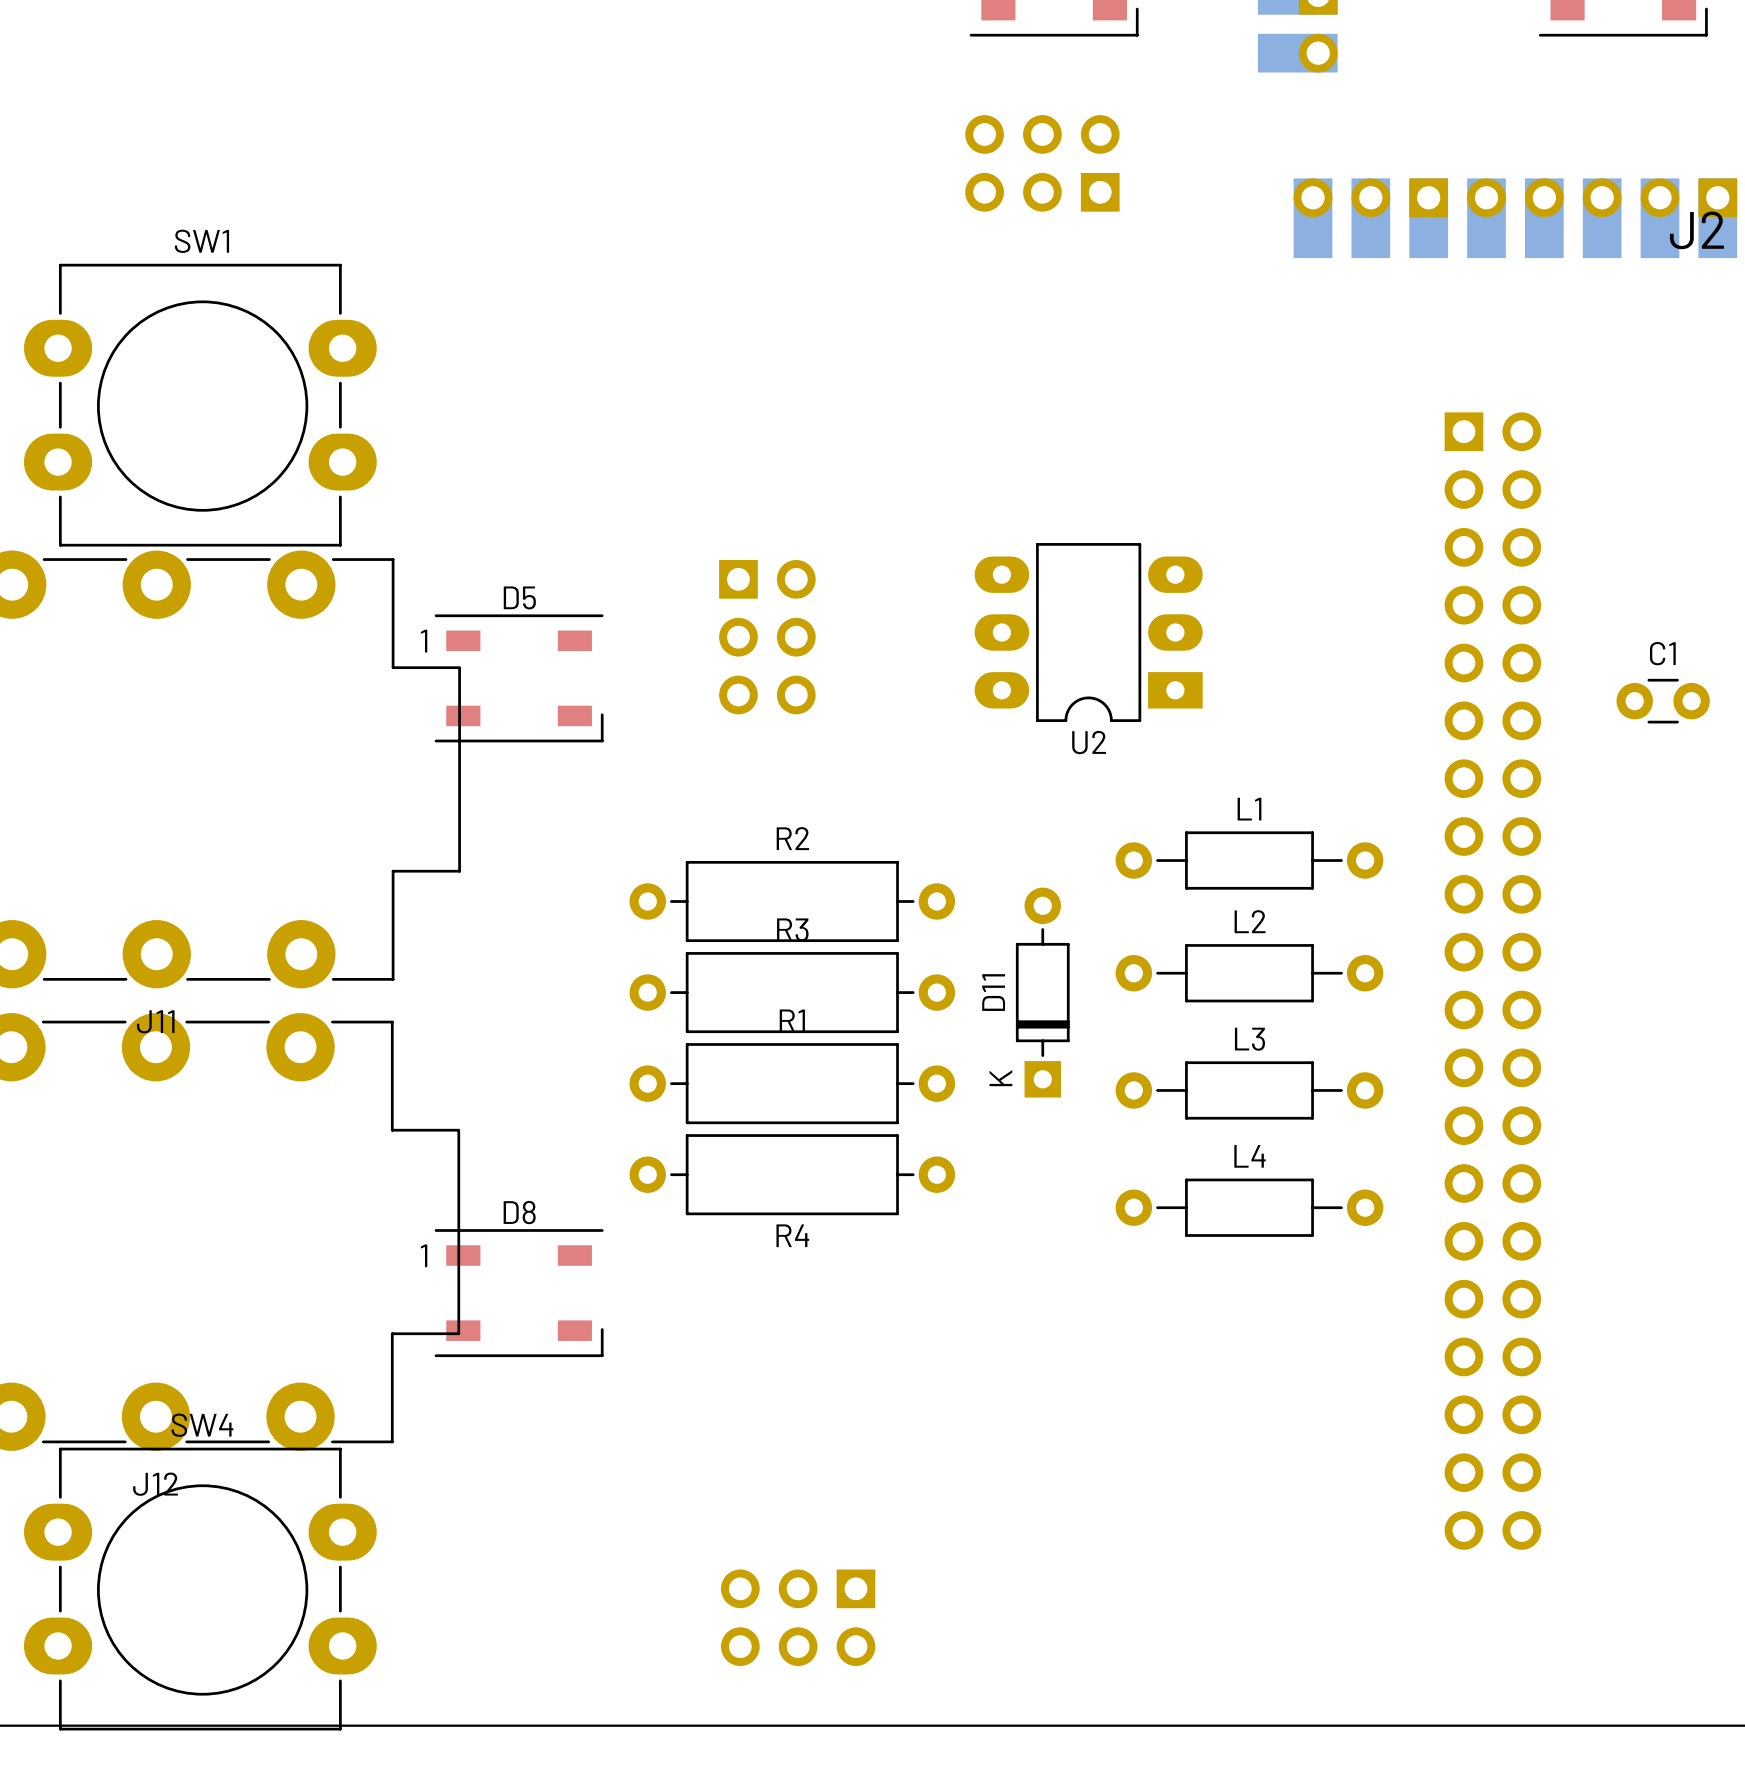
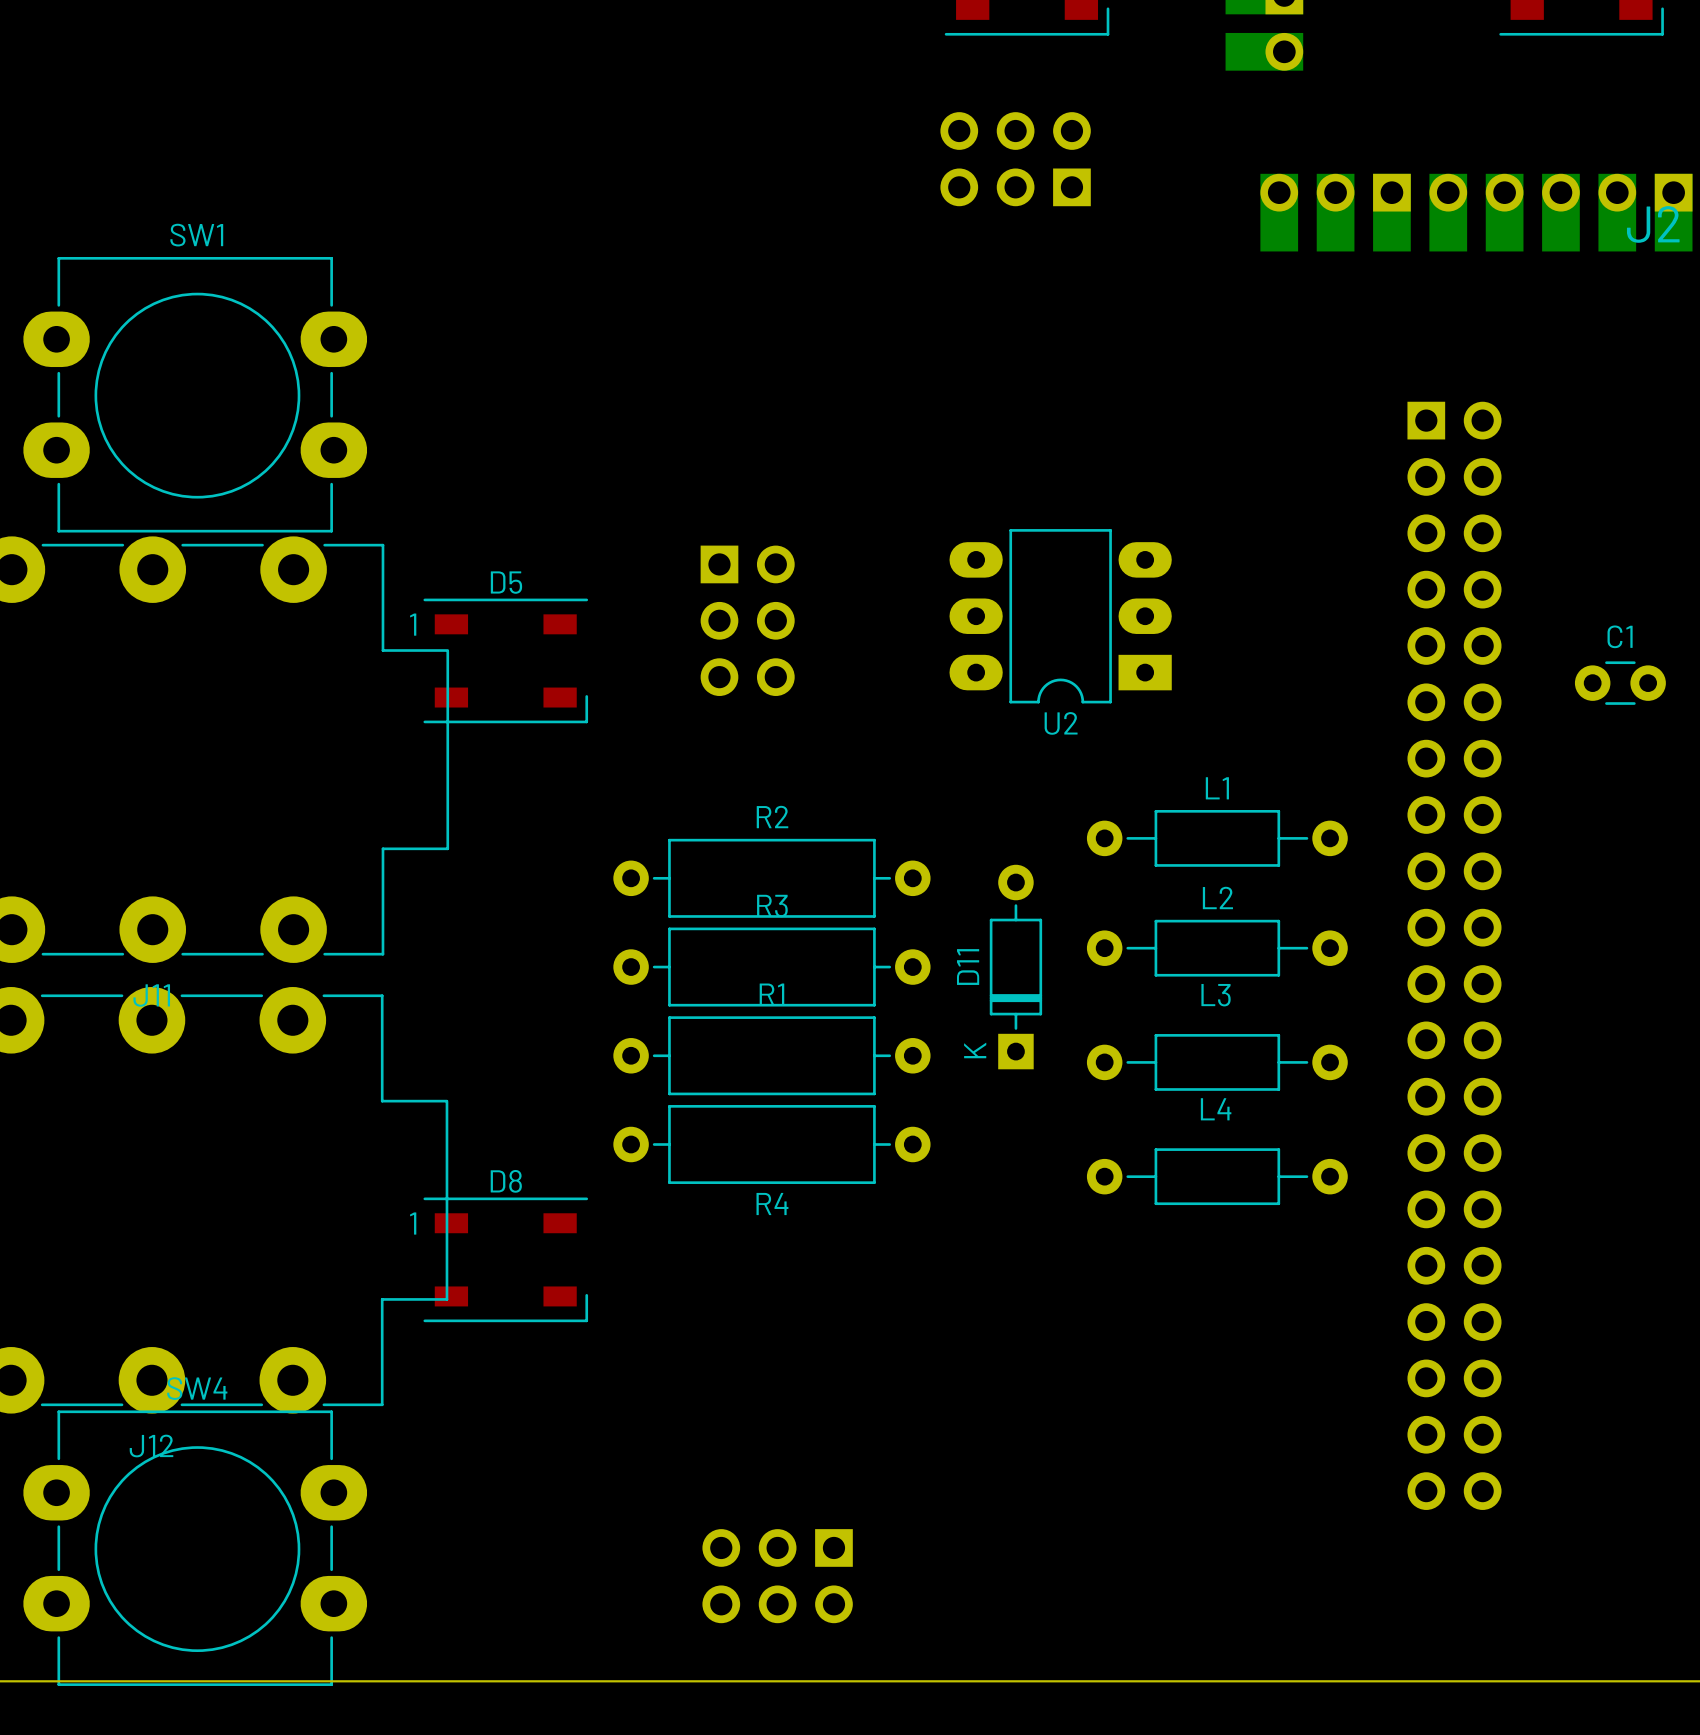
L3 name position: L3 (1249, 1039) -> L3 (1216, 995)
L4 name position: L4 (1250, 1156) -> L4 (1216, 1109)

